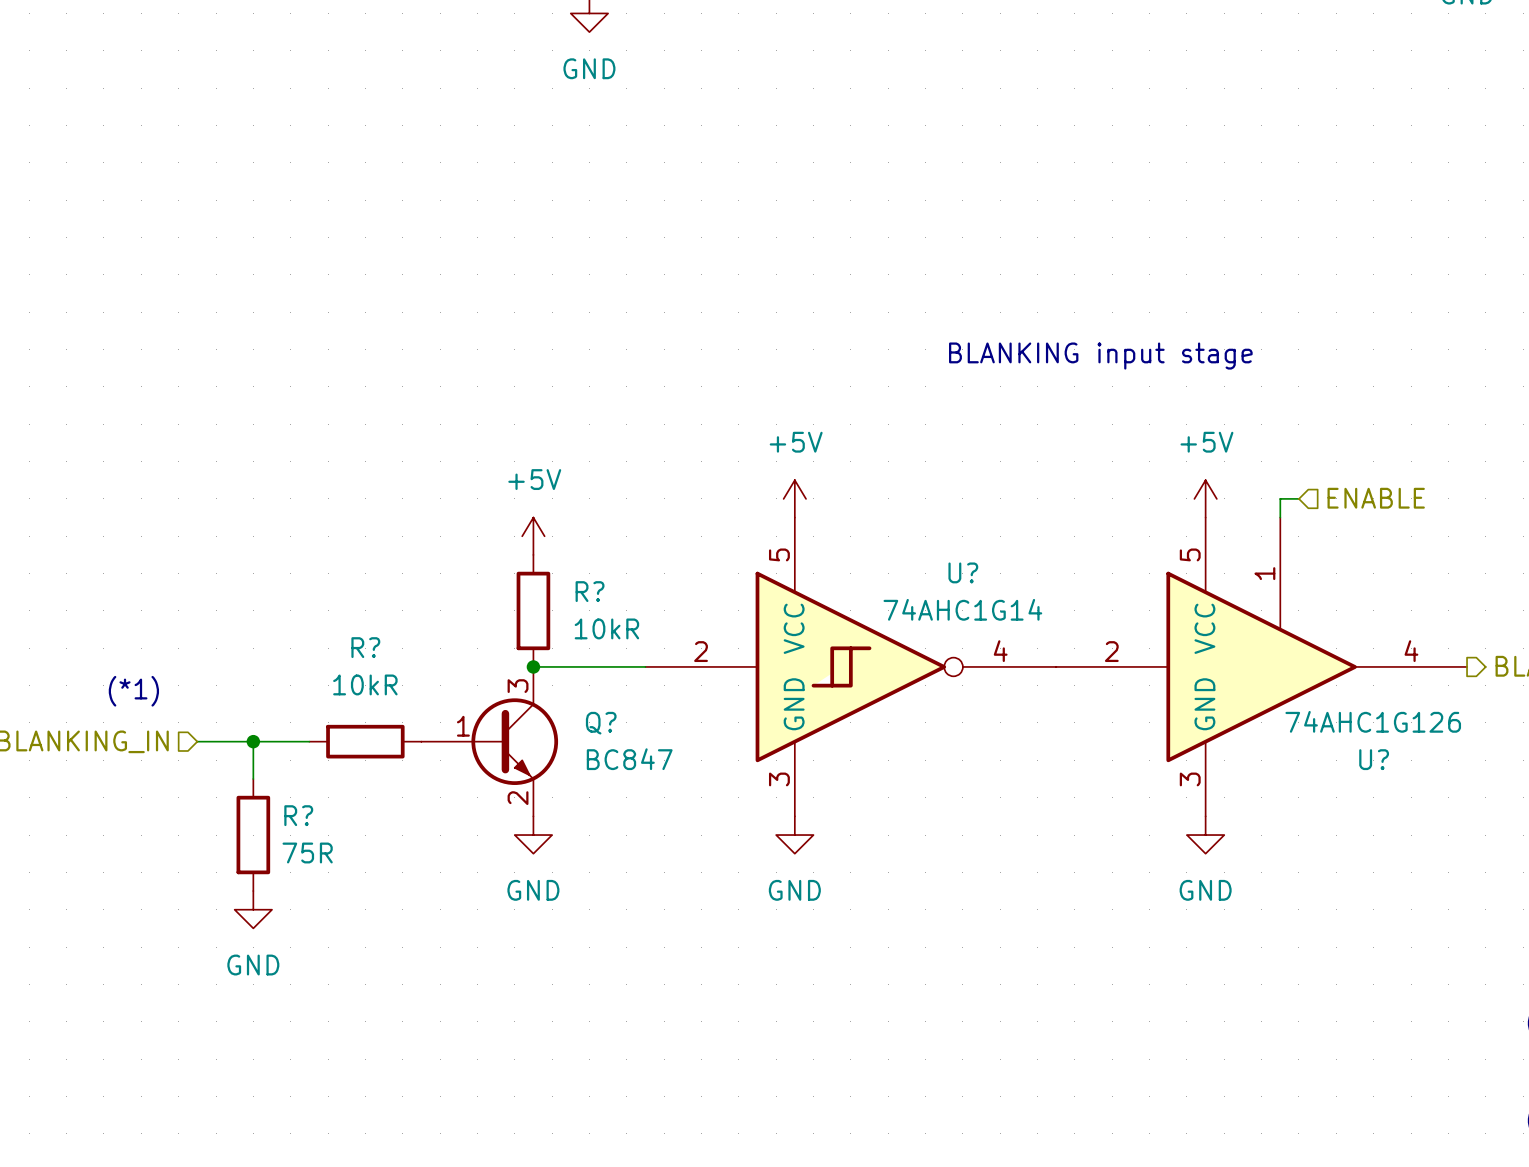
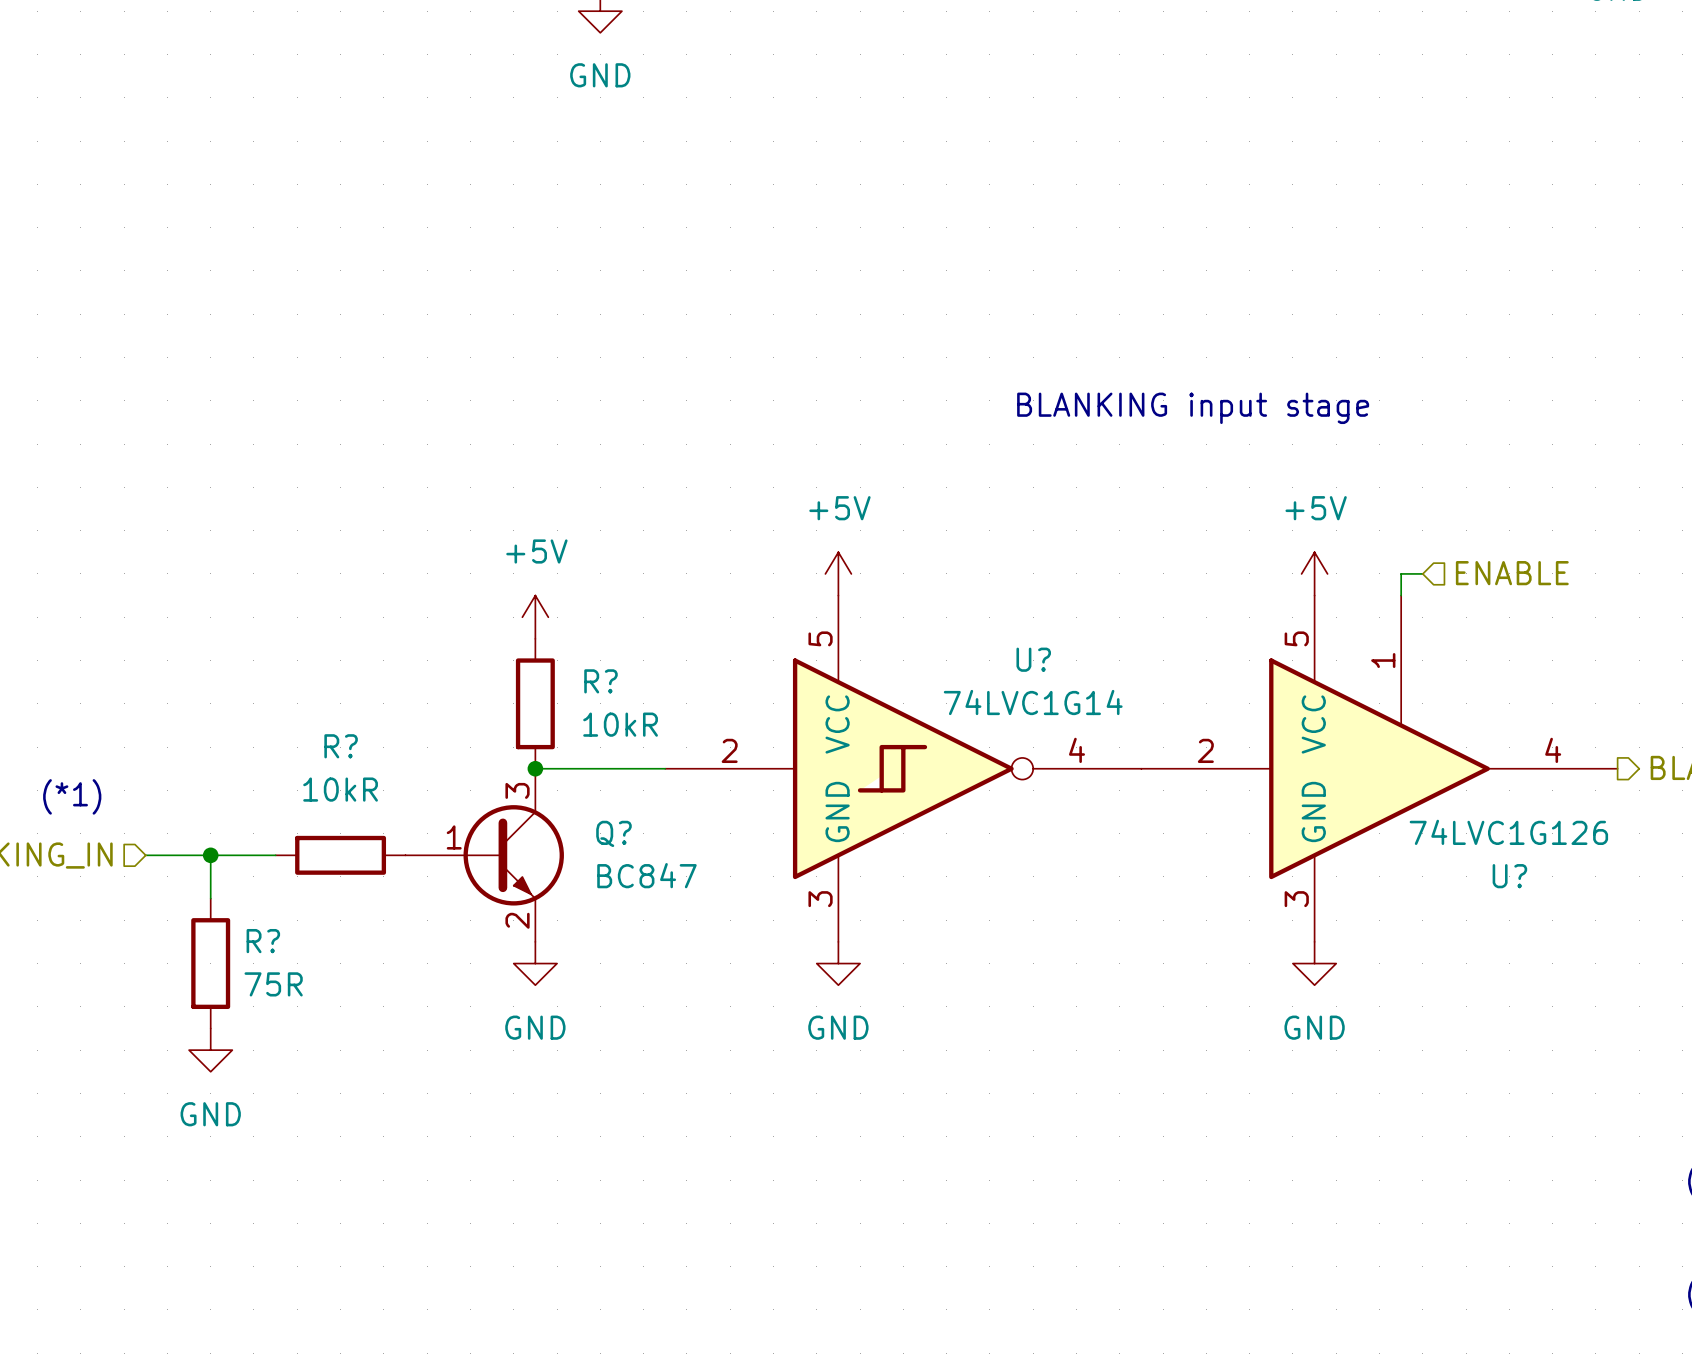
U? value: 74AHC1G14 (962, 609) -> 74LVC1G14 (1033, 702)
U? value: 74AHC1G126 (1373, 721) -> 74LVC1G126 (1508, 832)

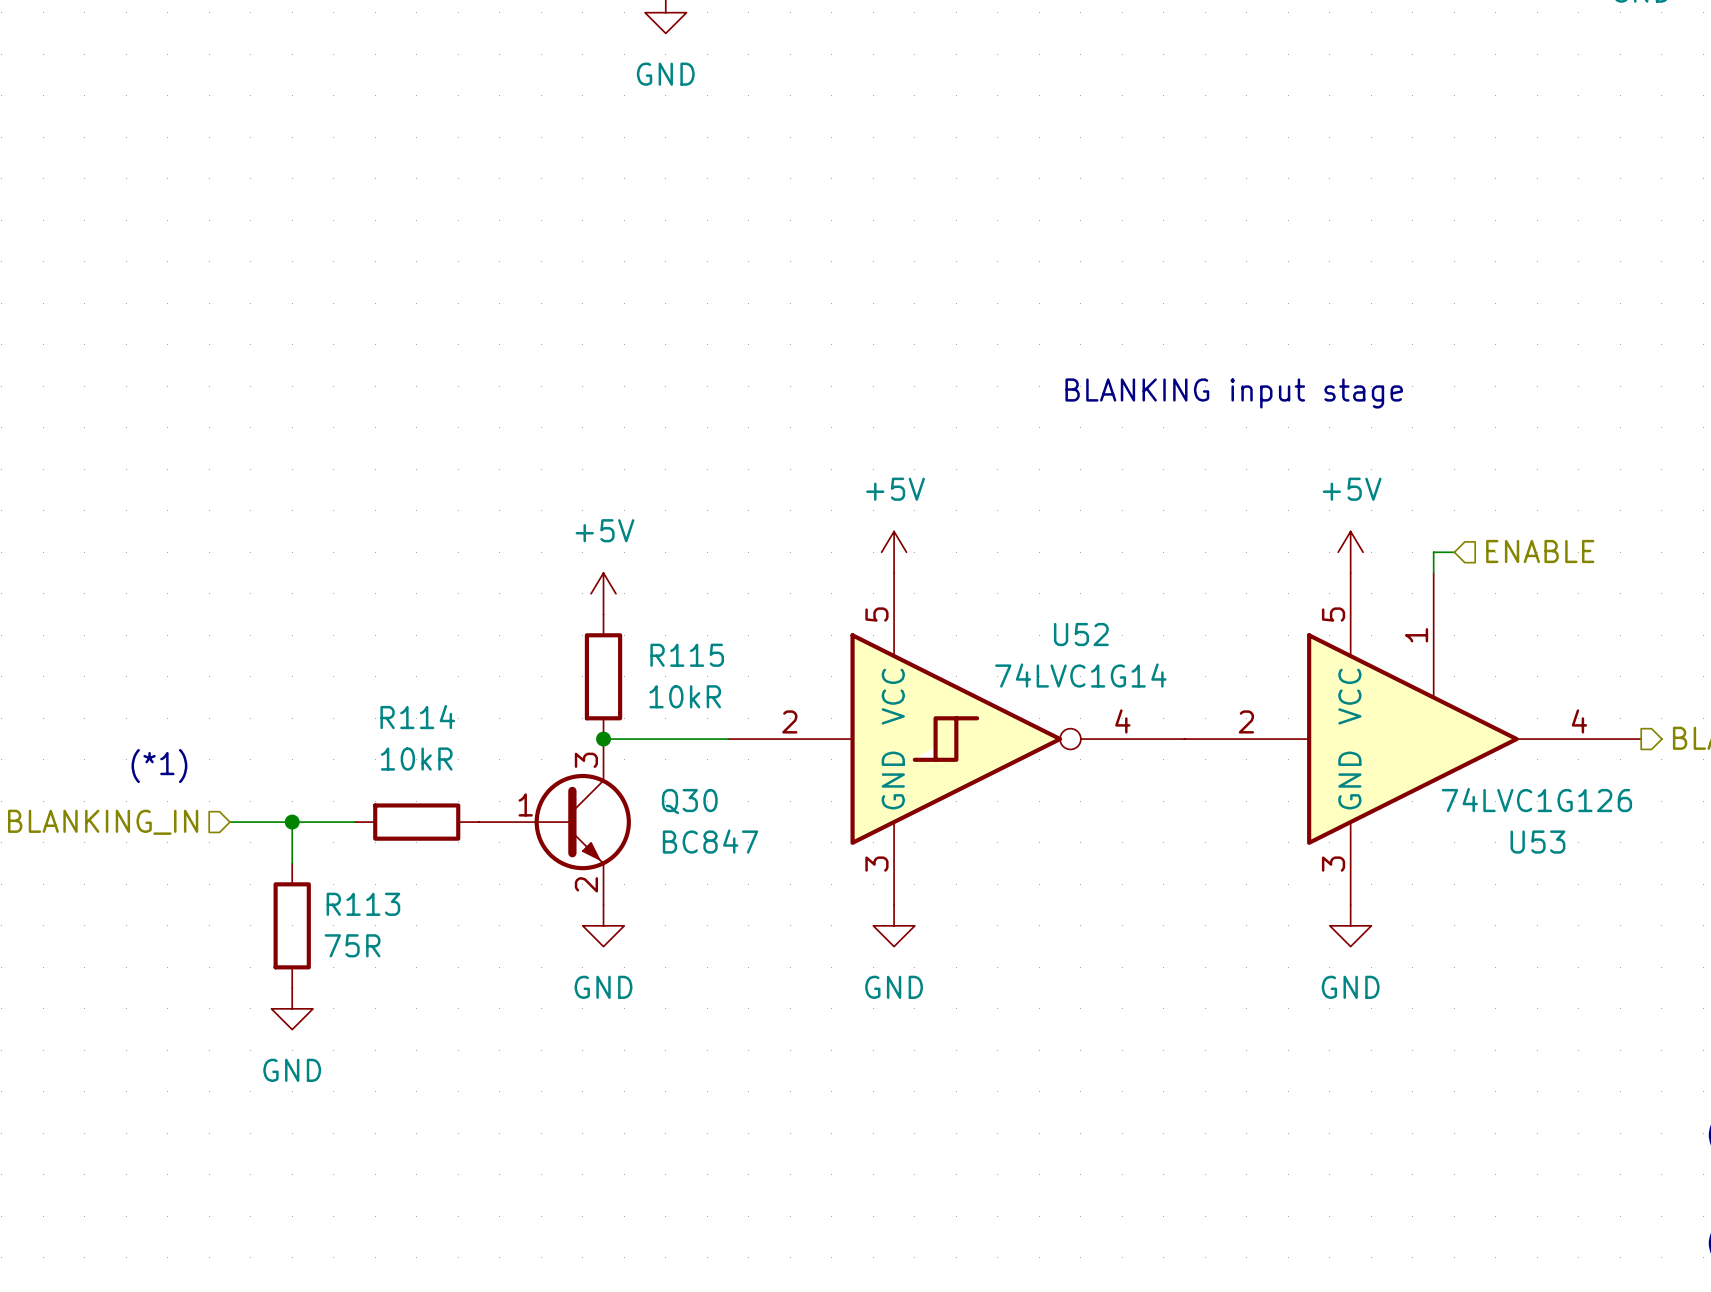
U? name: U? (1033, 659) -> U52 (1081, 634)
R? name: R? (600, 681) -> R115 (687, 655)
R? name: R? (341, 746) -> R114 (417, 717)
Q? name: Q? (613, 833) -> Q30 (689, 801)
U? name: U? (1509, 876) -> U53 (1537, 842)
R? name: R? (263, 941) -> R113 (363, 904)

